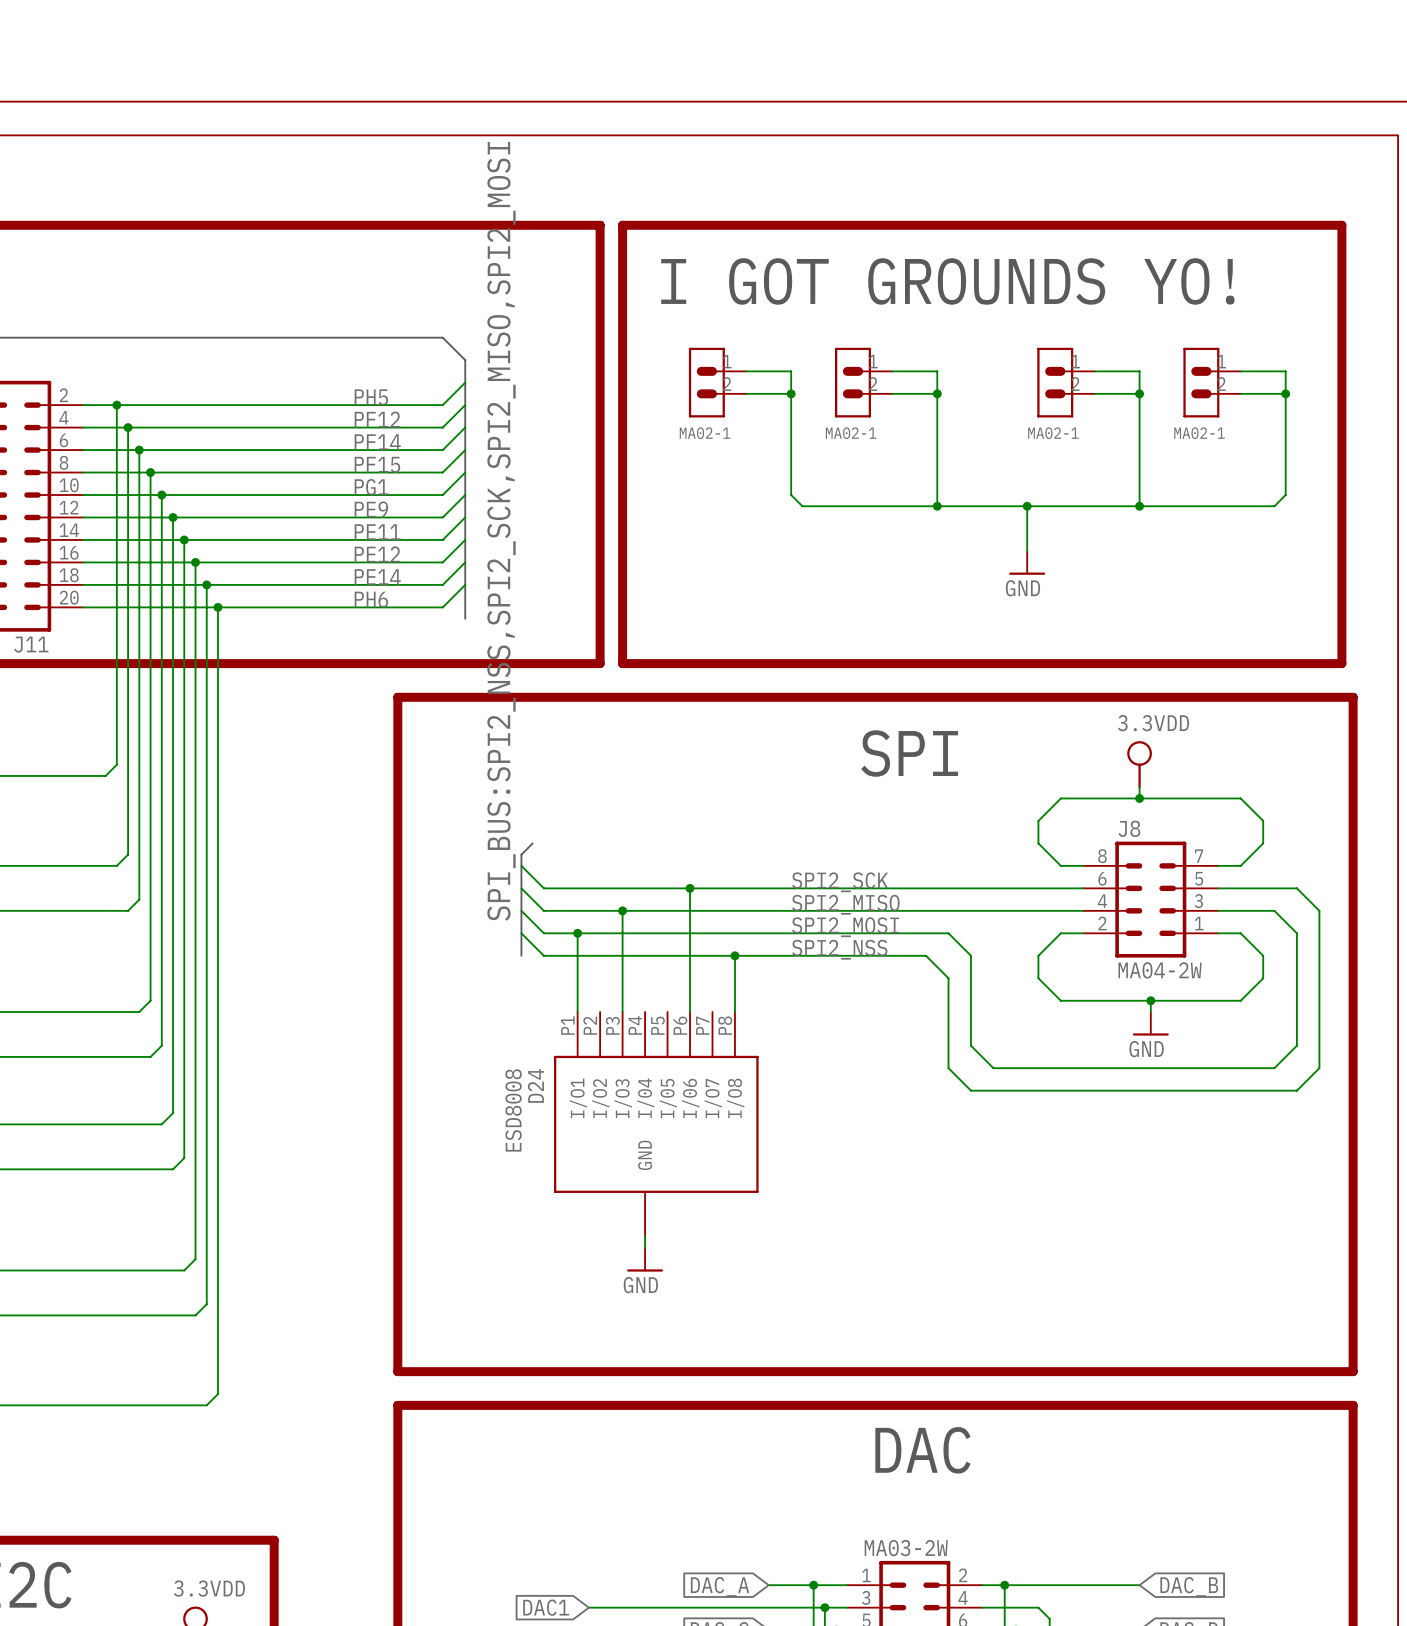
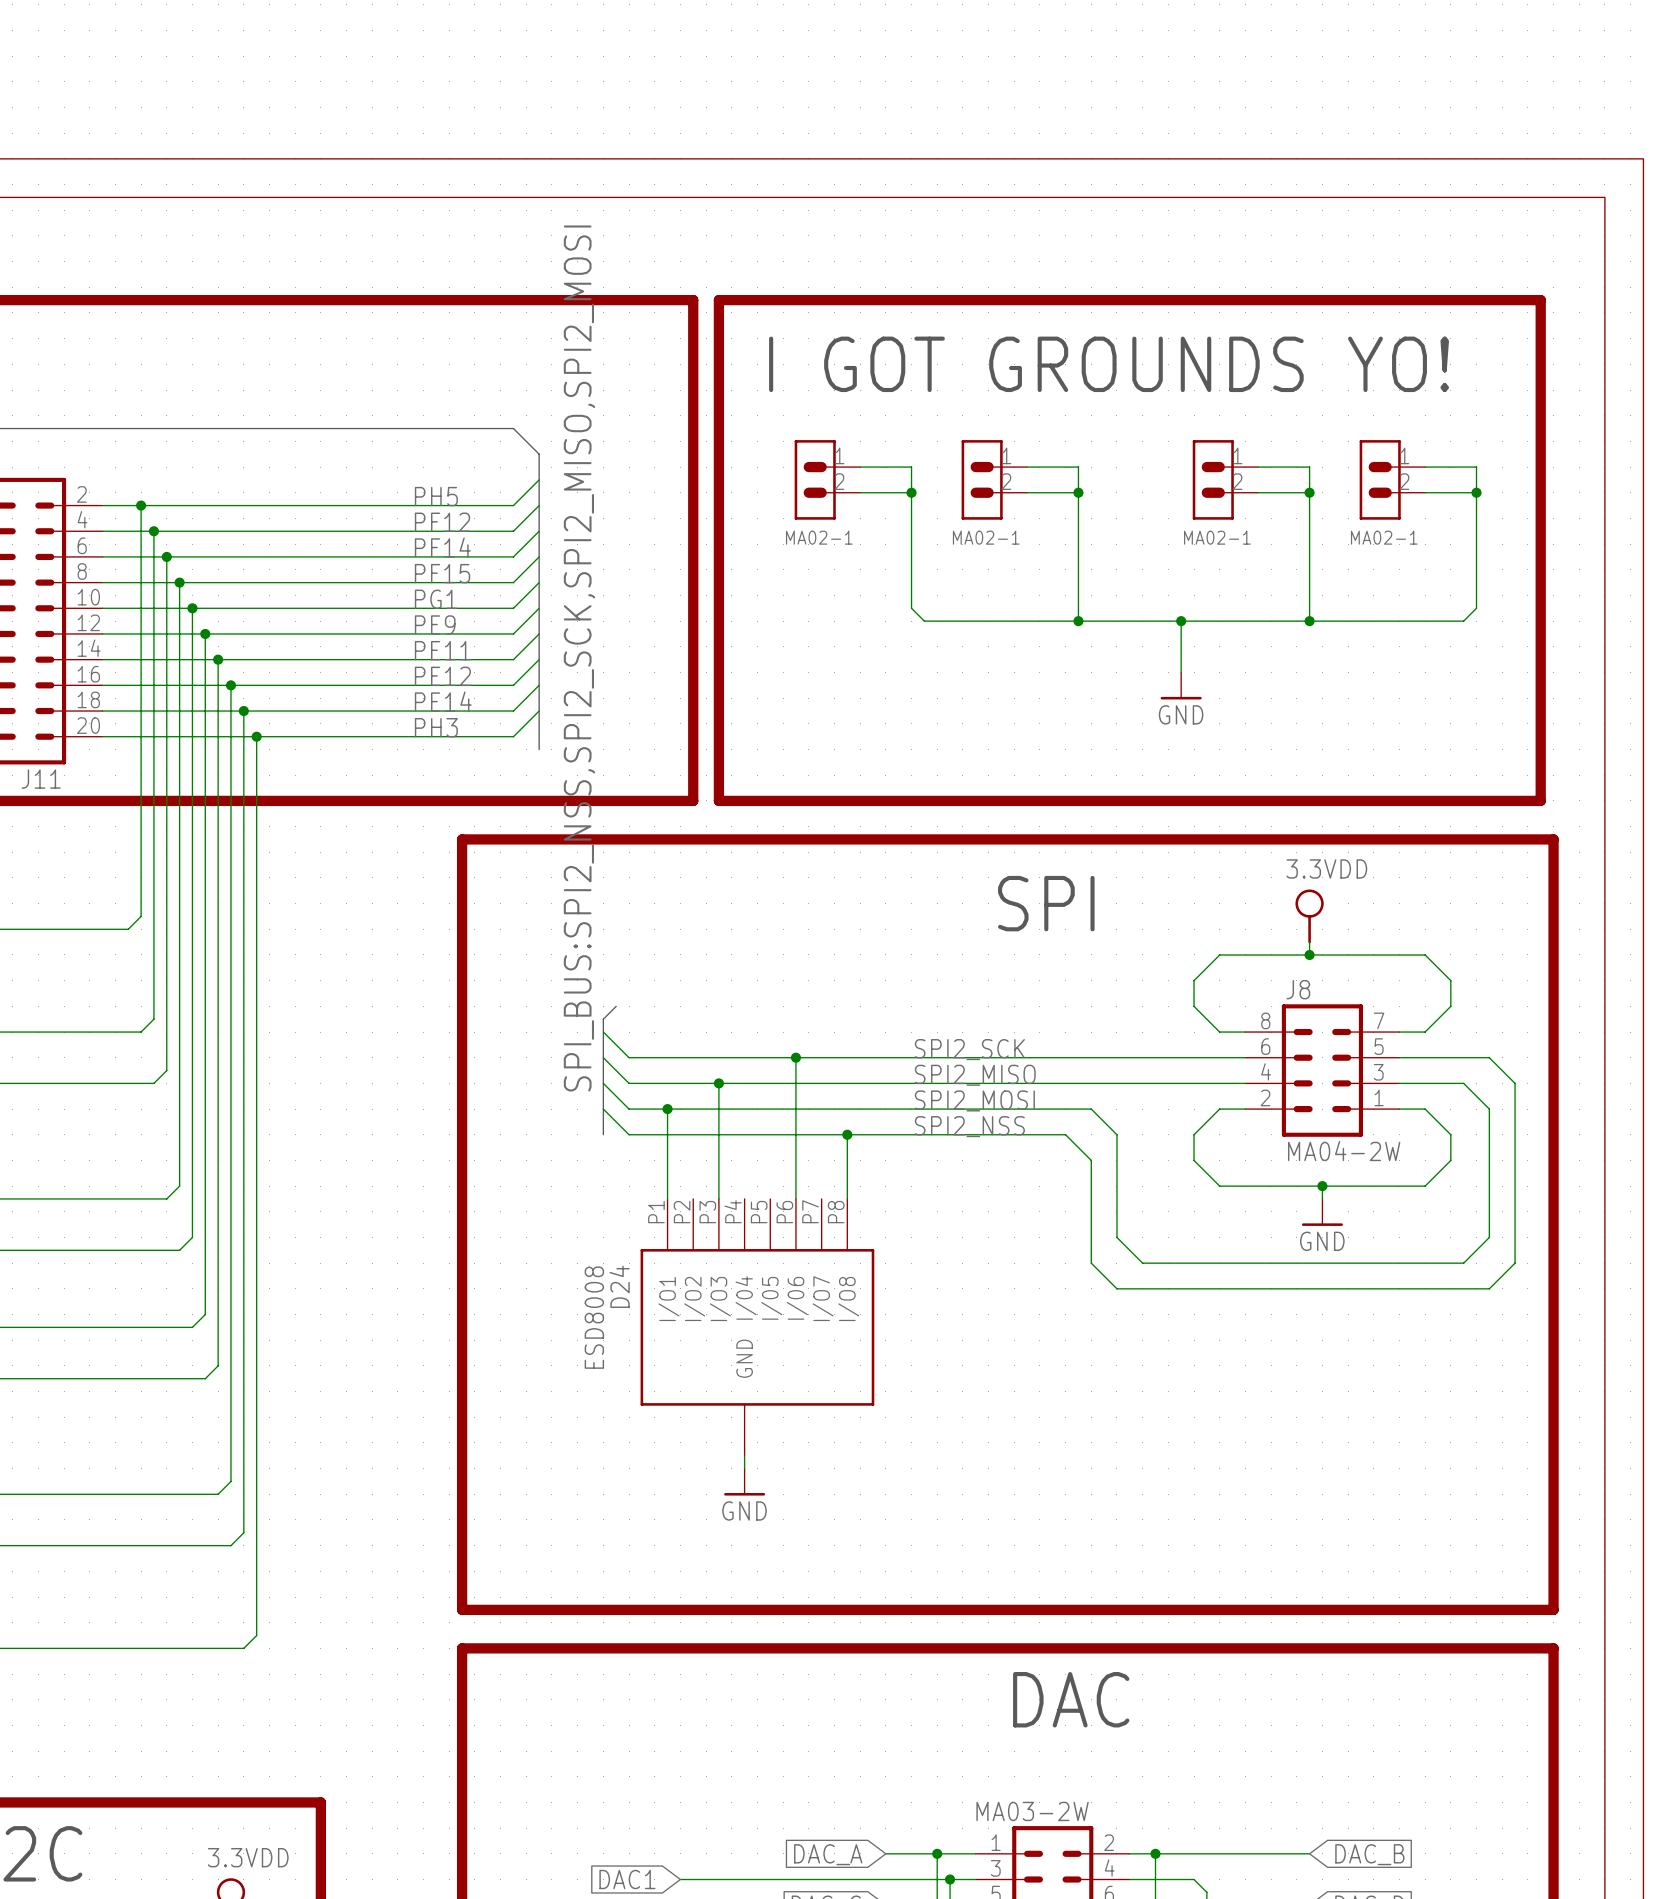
label: PH6 (371, 599) -> PH3 (436, 727)

